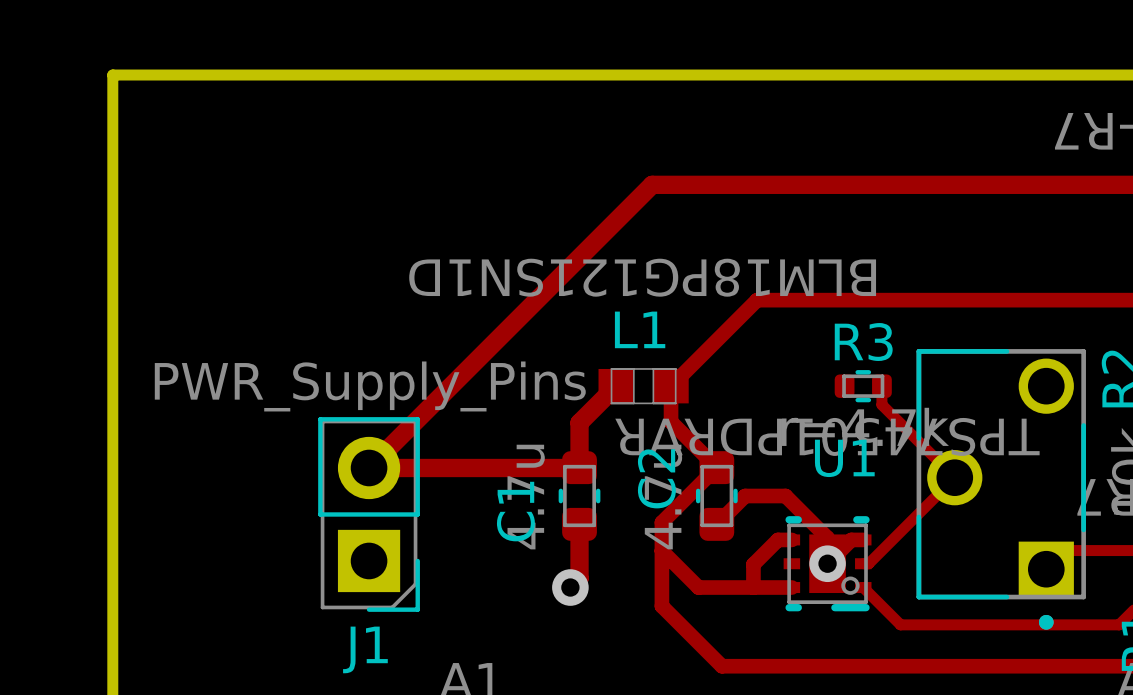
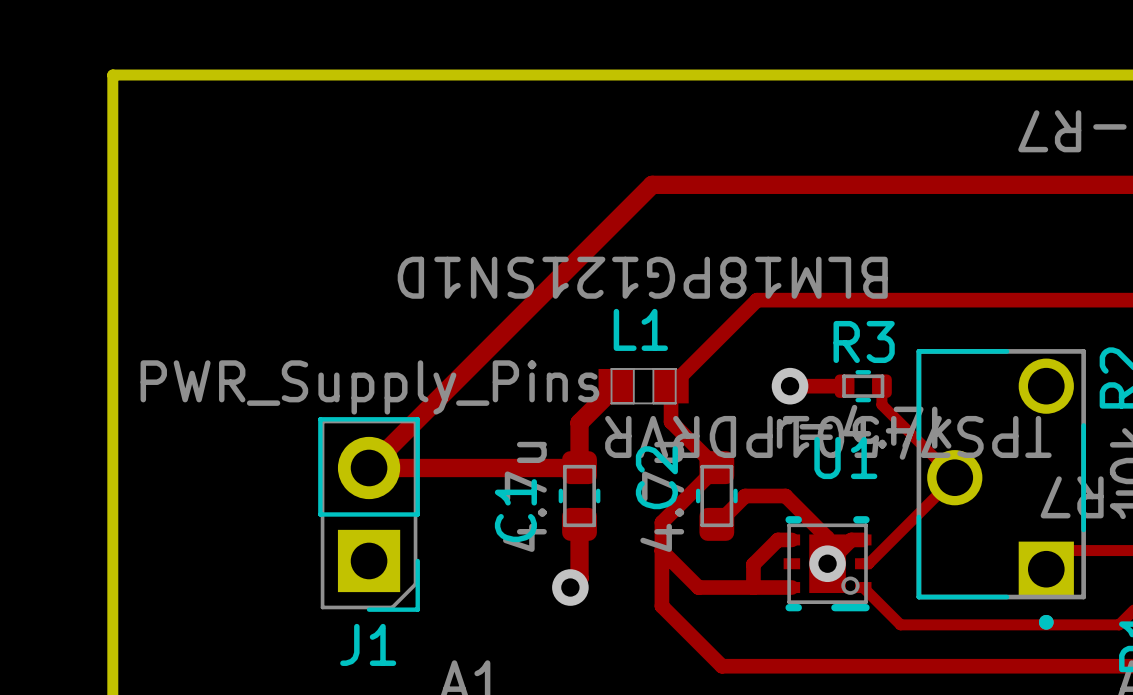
top track: none -> (790, 386) (844, 386)
via: none -> (790, 386)

